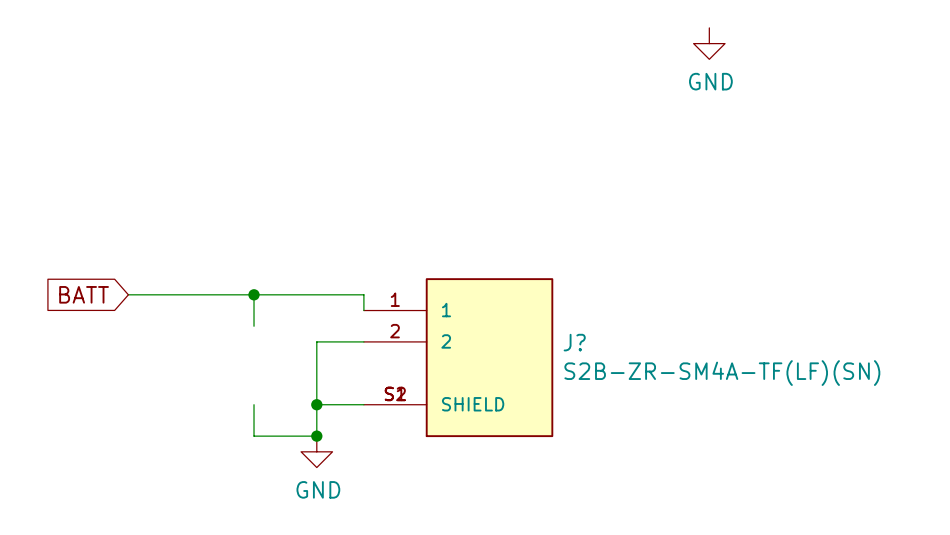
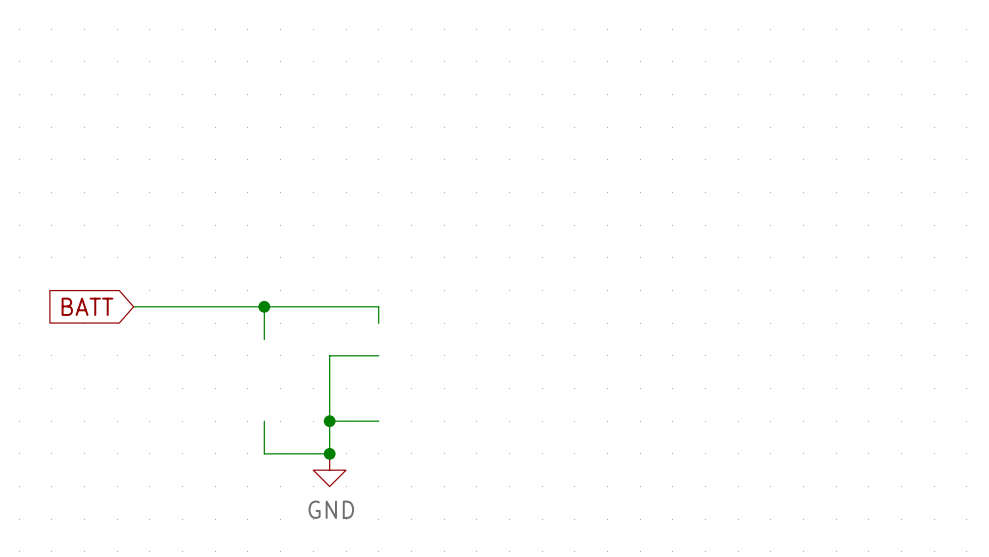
power symbol: GND (709, 43) -> none
J?: S2B-ZR-SM4A-TF(LF)(SN) (458, 357) -> none

